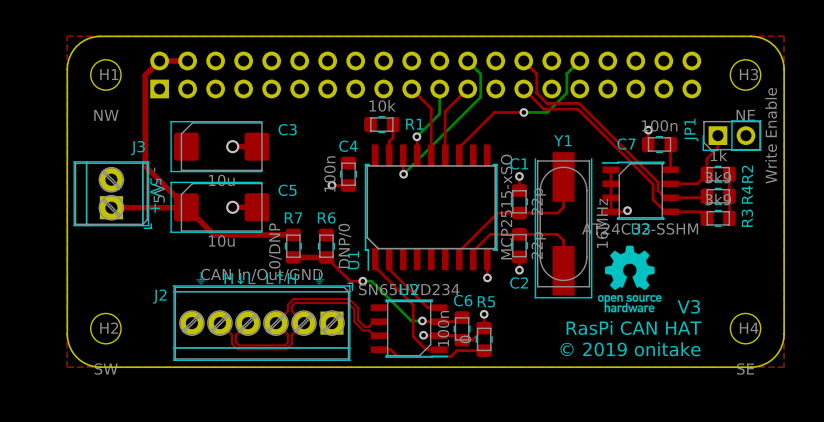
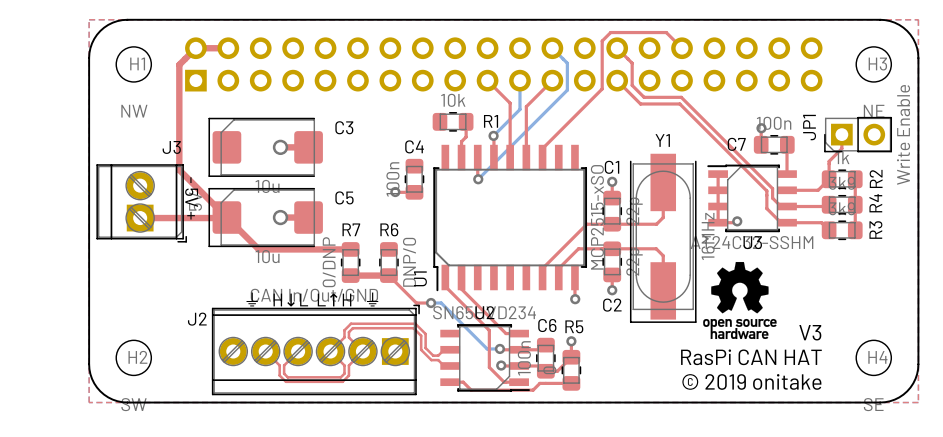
bottom track: (579, 60) (566, 73) (566, 93) (547, 112) (523, 112) -> none
top track: (494, 112) (523, 112) -> (583, 107) (602, 88) (602, 41) (610, 32) (666, 32) (682, 48)
via: (523, 112) -> none

